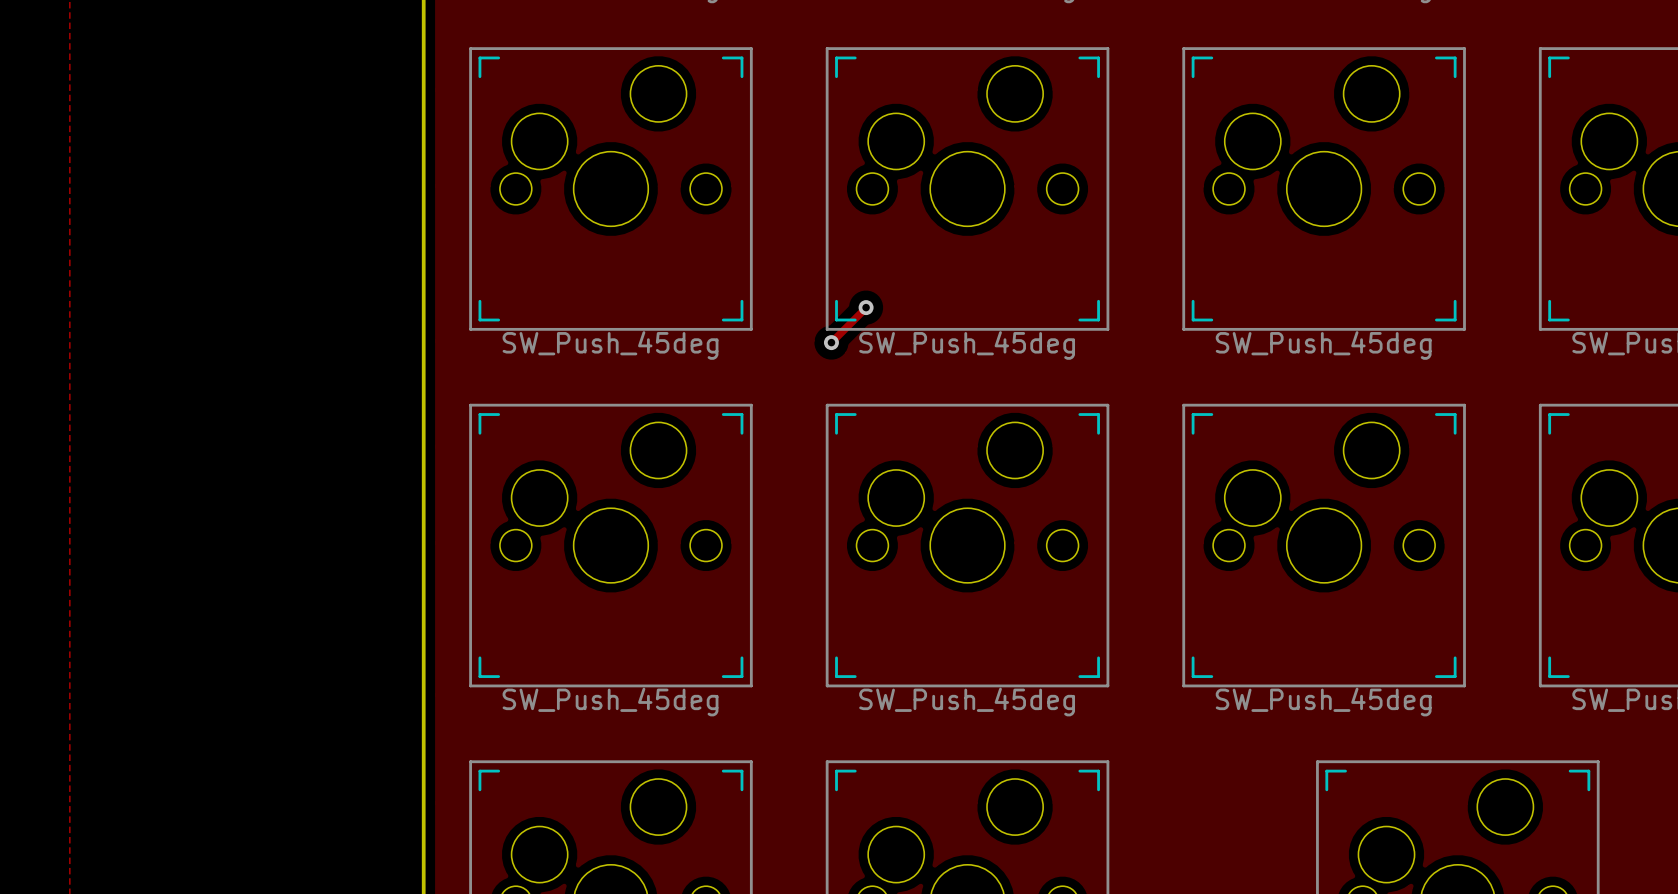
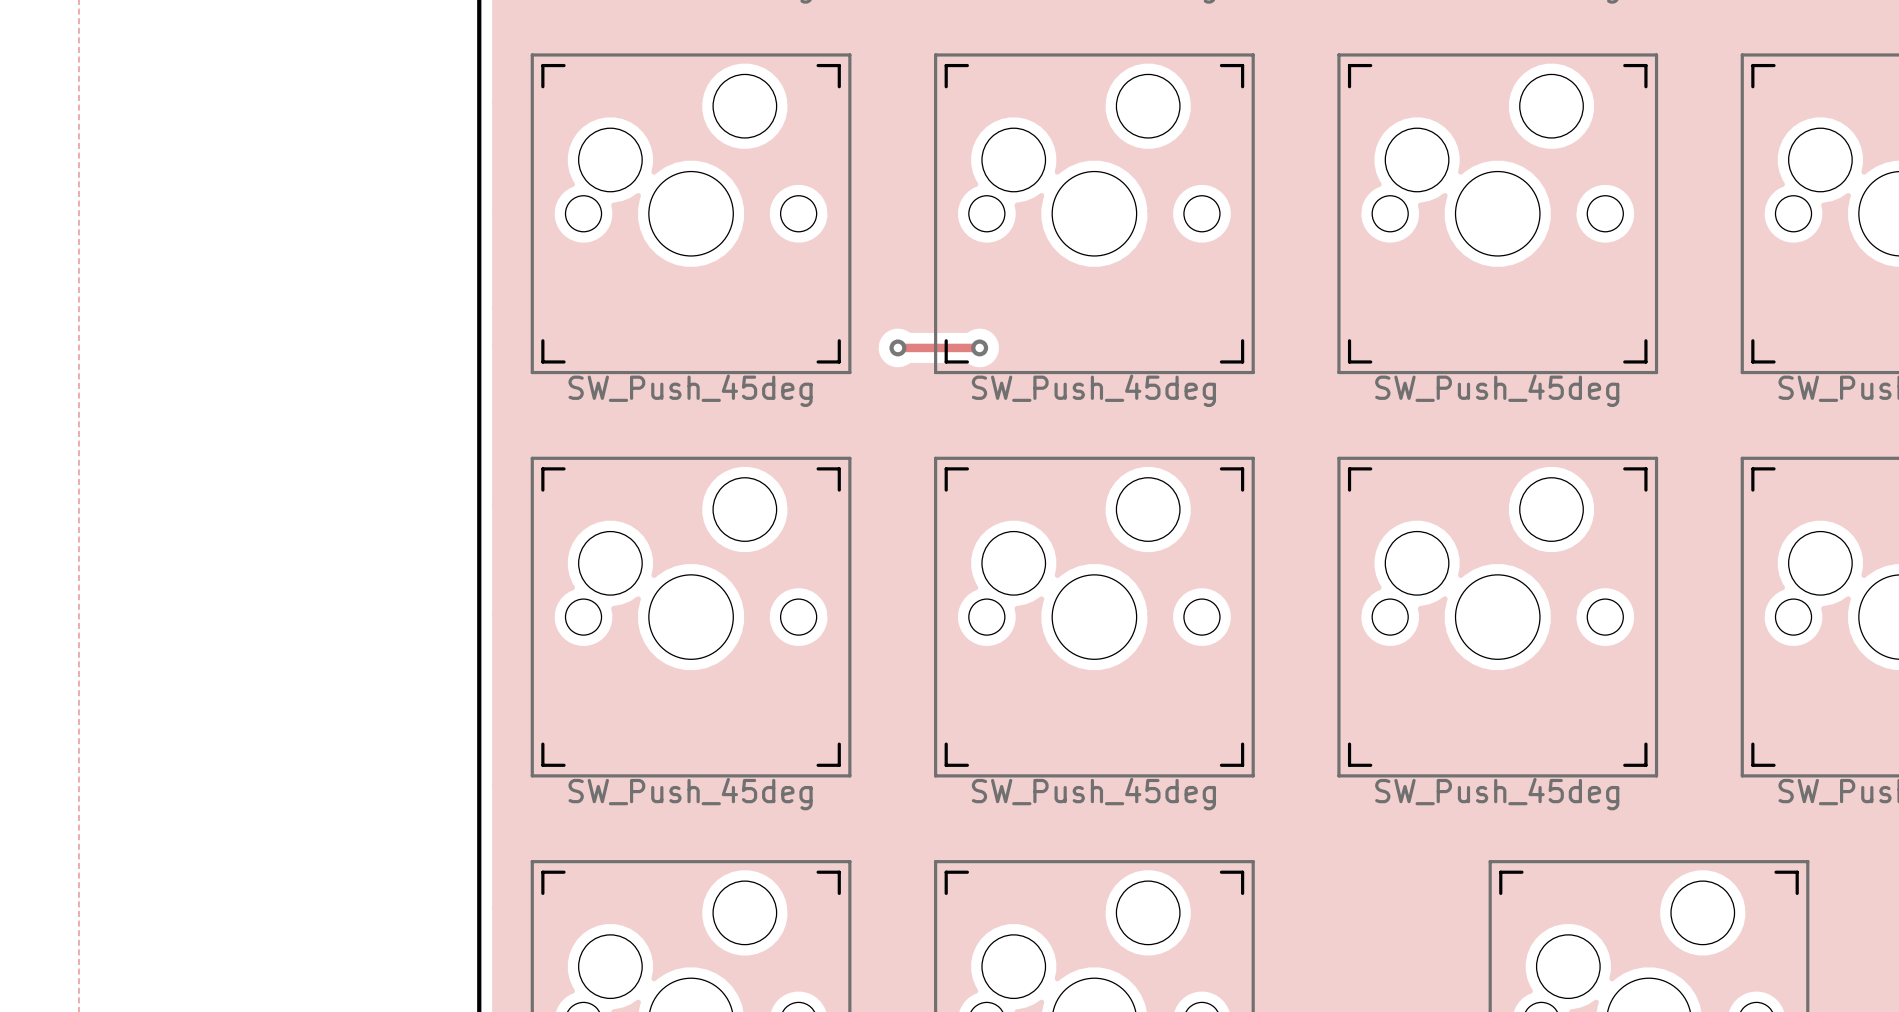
track: (866, 307) (831, 342) -> (979, 347) (897, 347)
via position: (831, 342) -> (897, 347)

